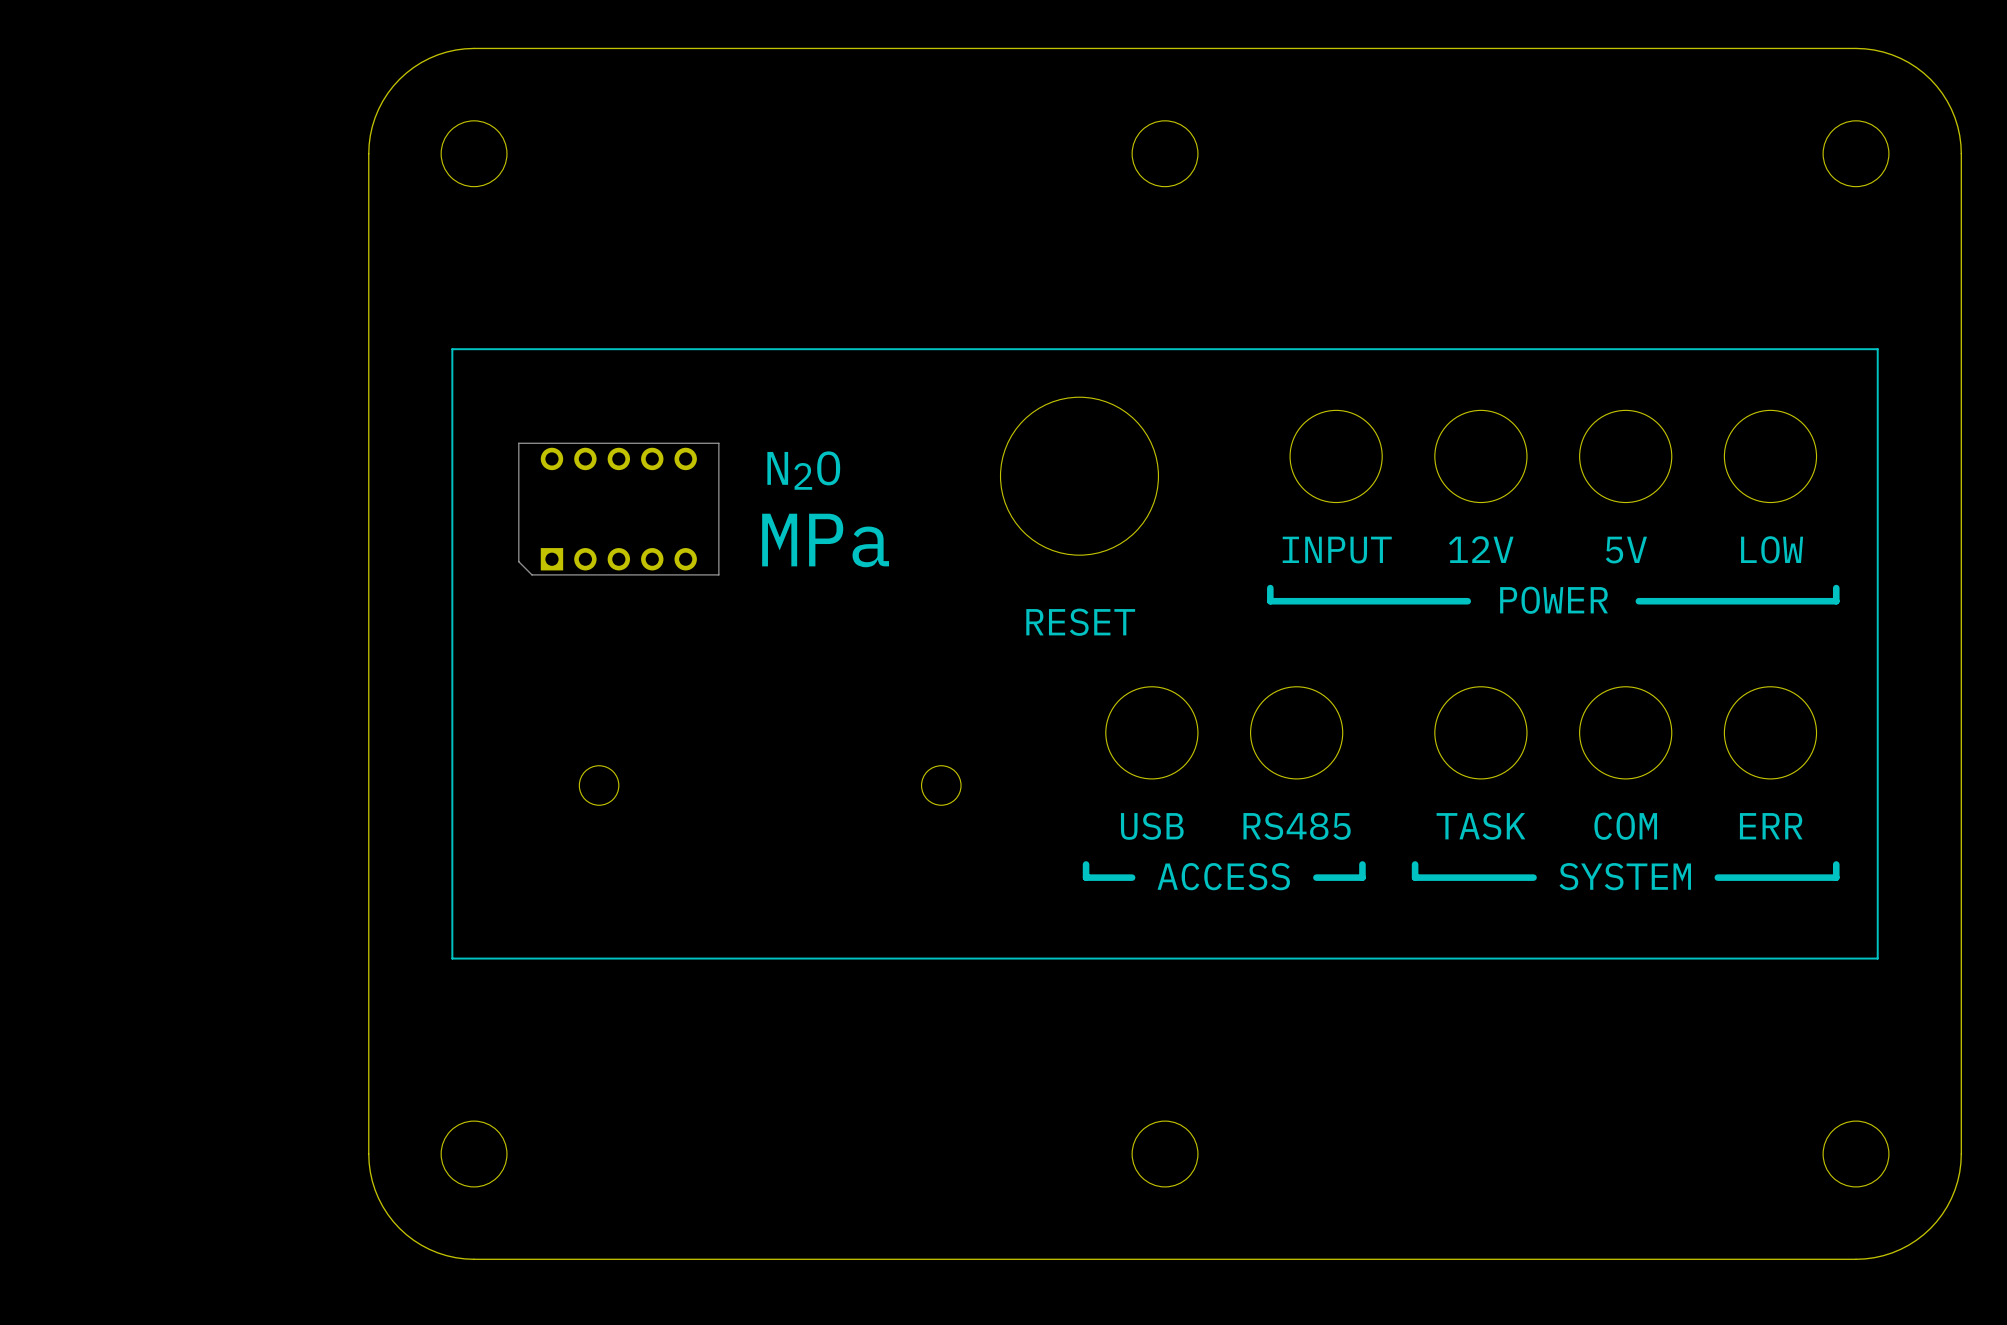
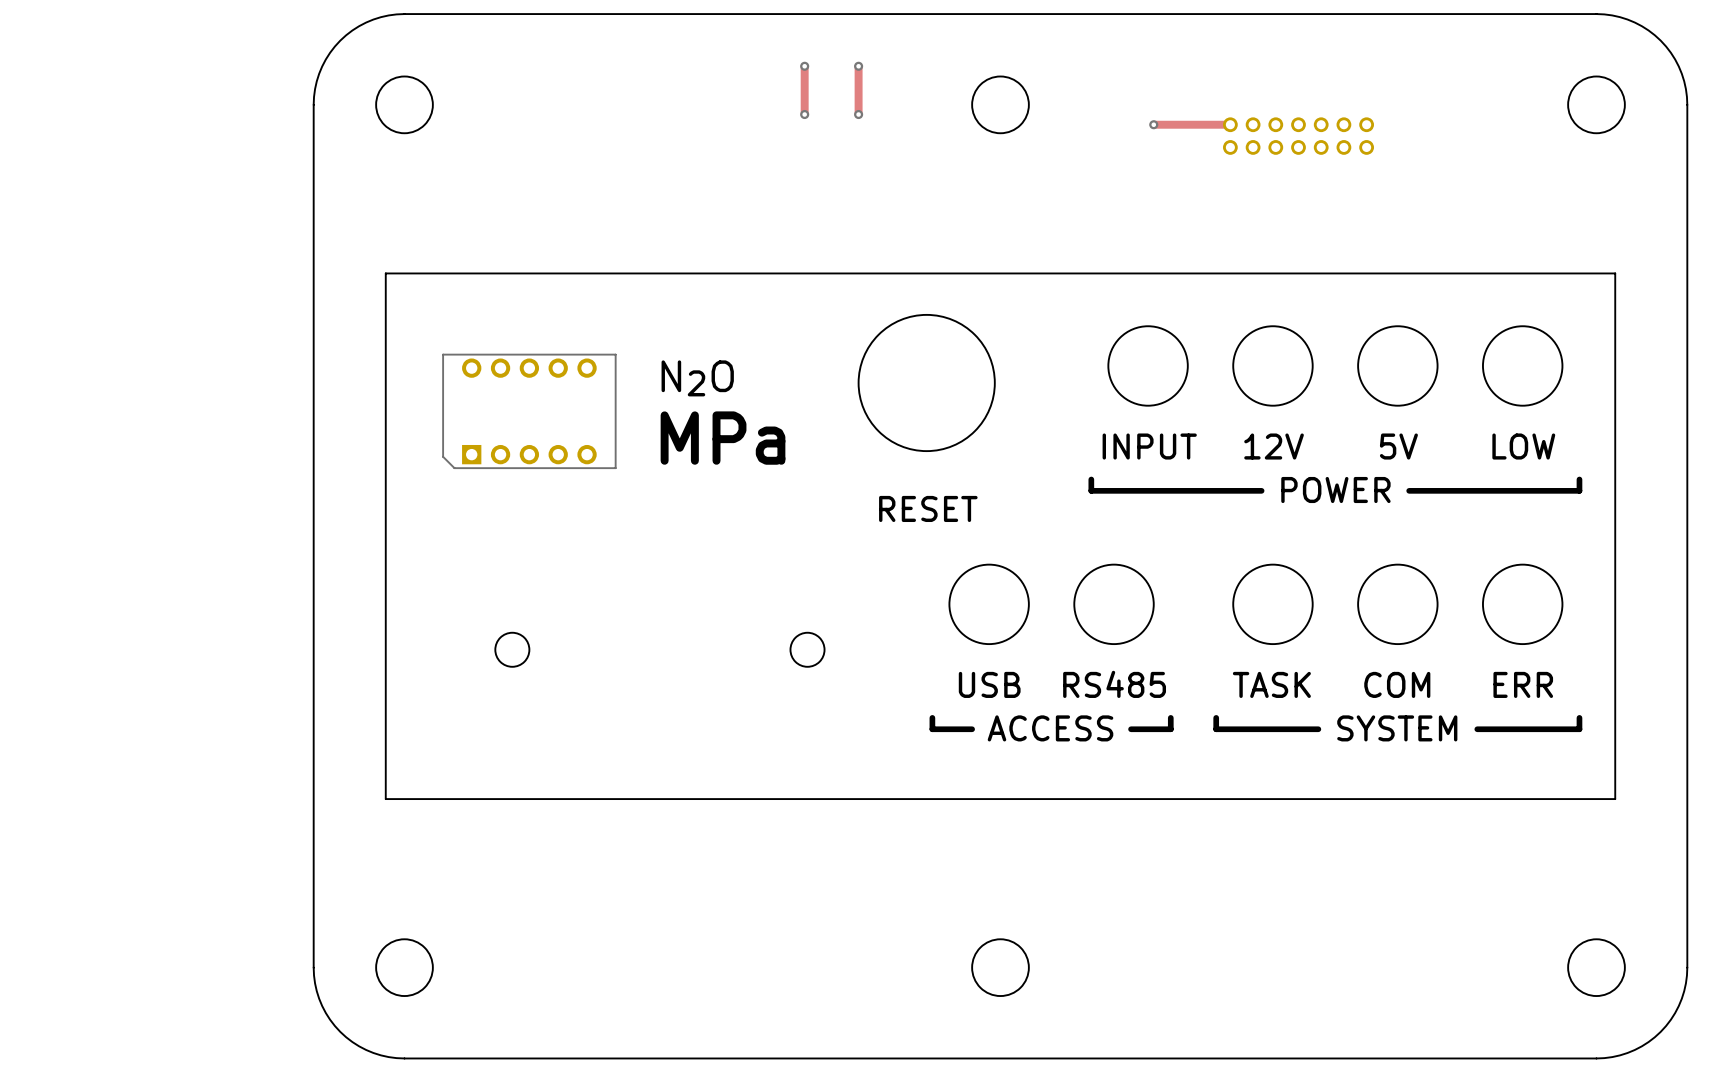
track: none -> (804, 66) (804, 114)
via: none -> (804, 66)
track: none -> (858, 66) (858, 114)
via: none -> (858, 66)
via: none -> (804, 114)
via: none -> (858, 114)
track: none -> (1153, 124) (1230, 124)
via: none -> (1153, 124)
part: none -> (1298, 136)

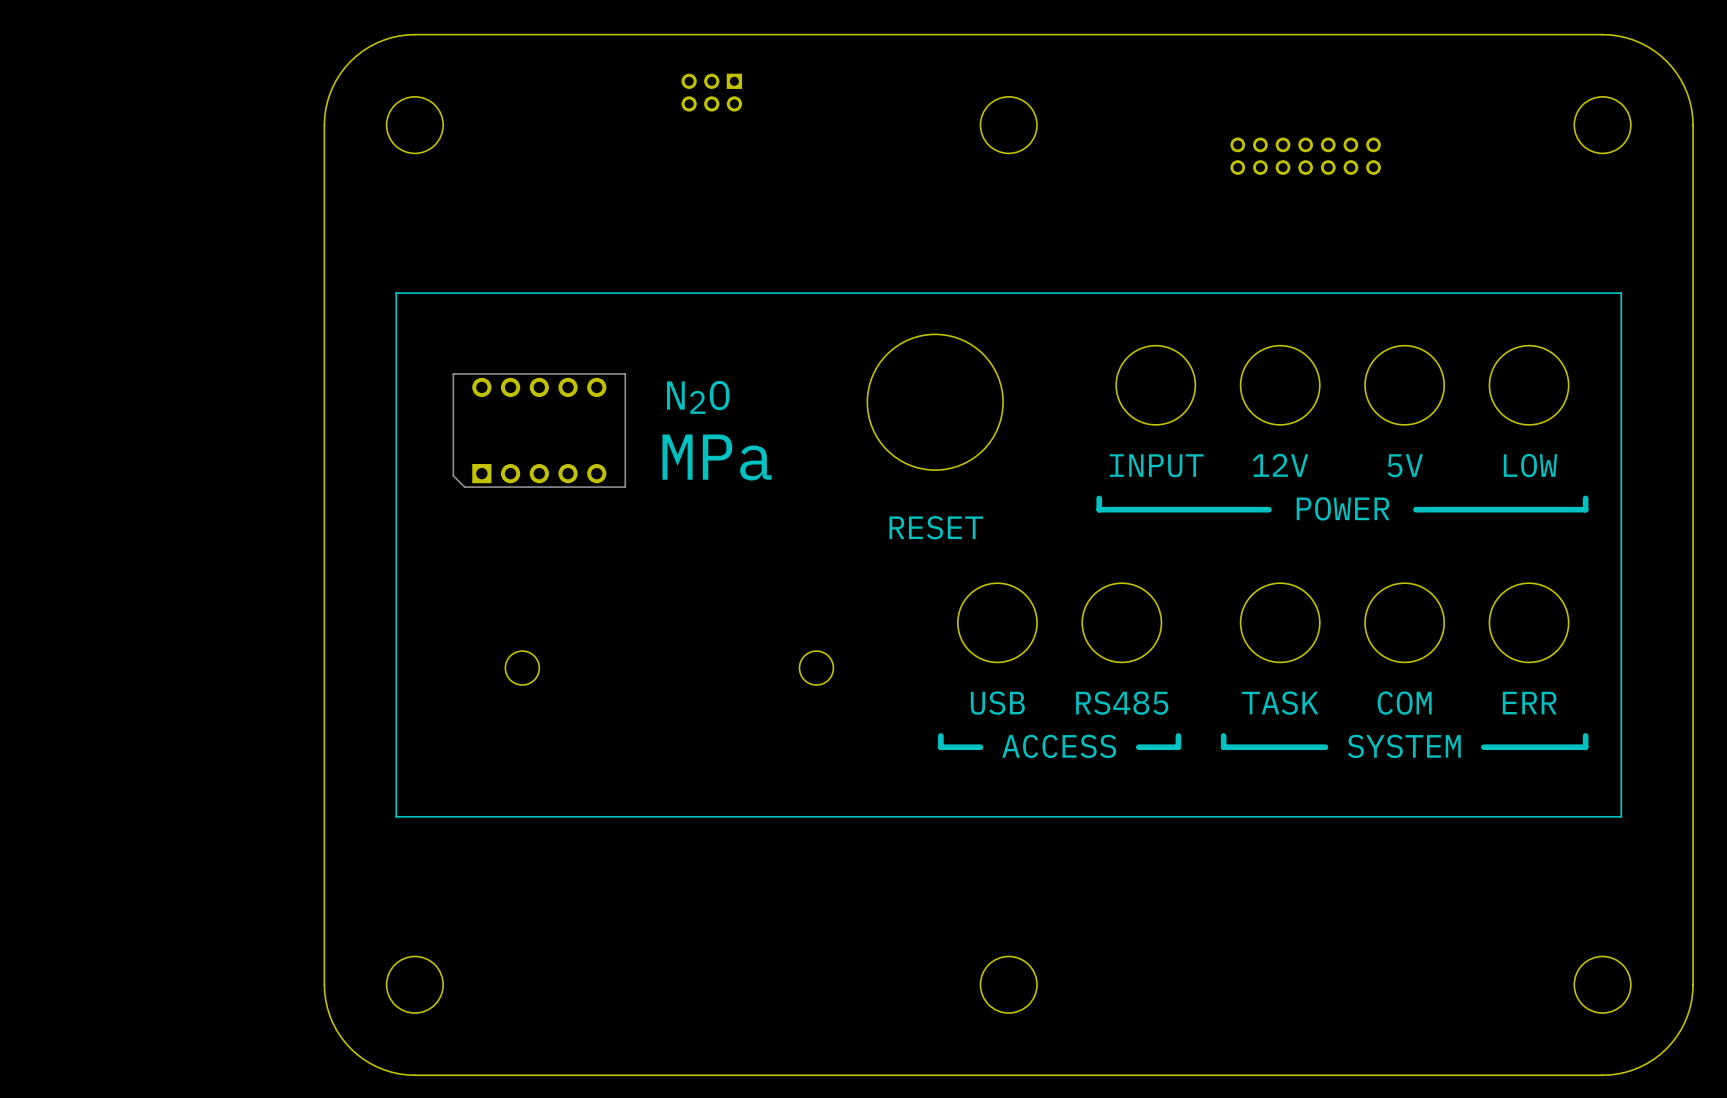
track: (804, 66) (804, 114) -> none
via: (804, 66) -> none
track: (858, 66) (858, 114) -> none
via: (858, 66) -> none
part: none -> (711, 92)
via: (804, 114) -> none
via: (858, 114) -> none
track: (1153, 124) (1230, 124) -> none
via: (1153, 124) -> none

